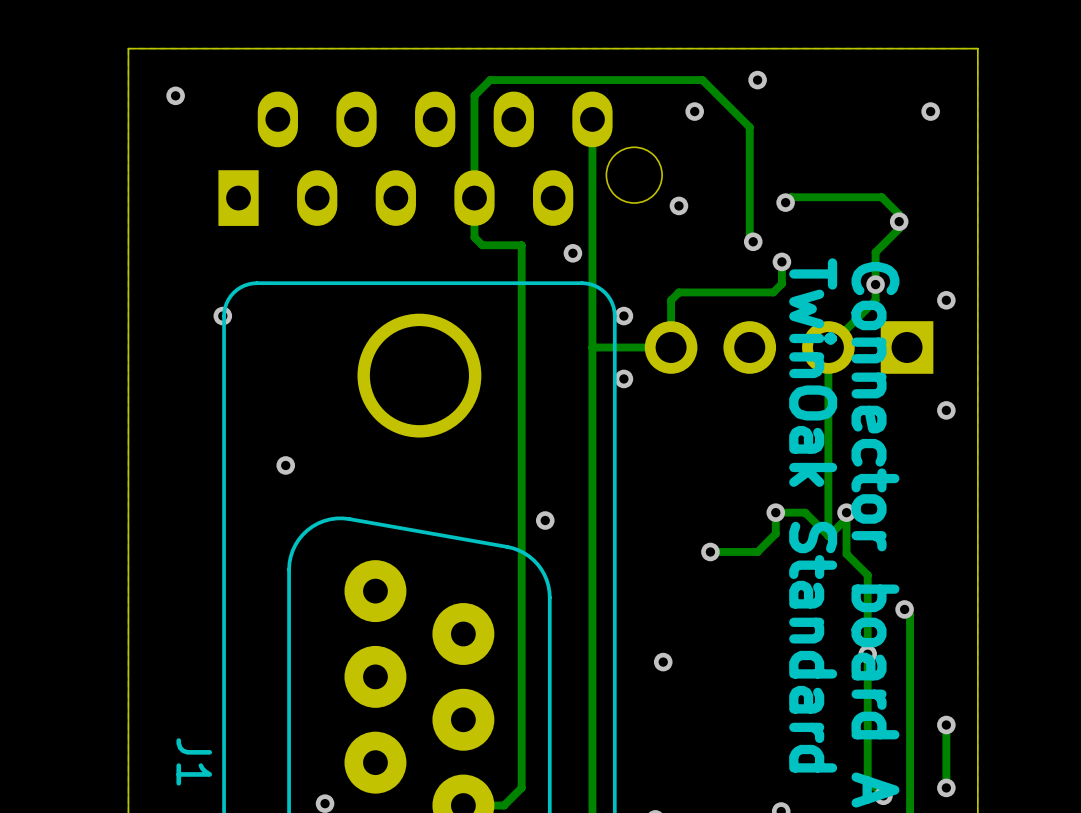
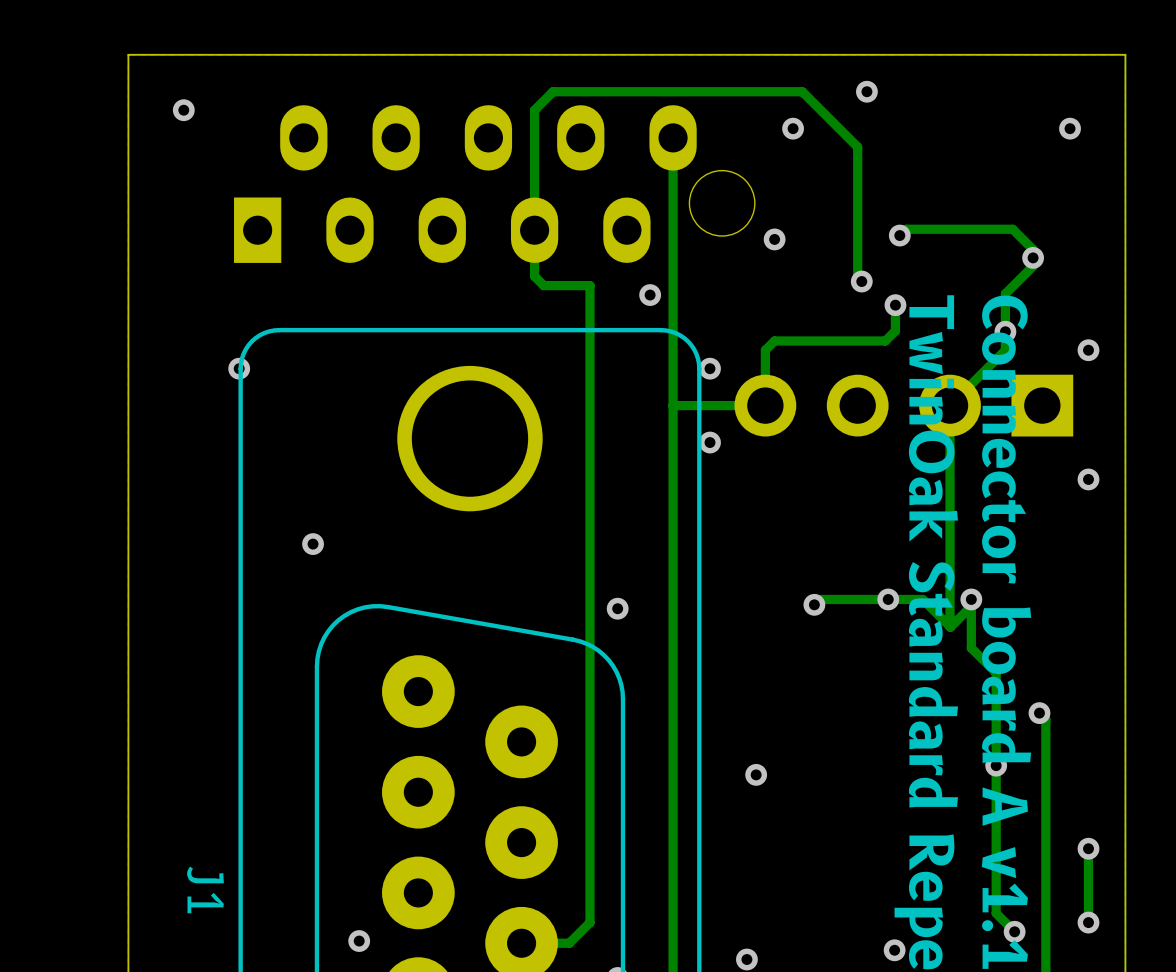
track: (775, 512) (775, 533) (757, 551) (710, 551) -> (888, 599) (819, 599) (814, 604)
via position: (710, 551) -> (814, 604)

